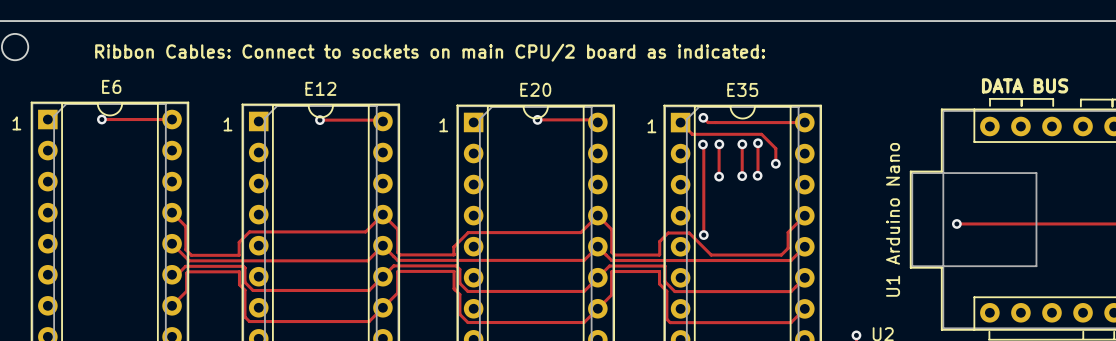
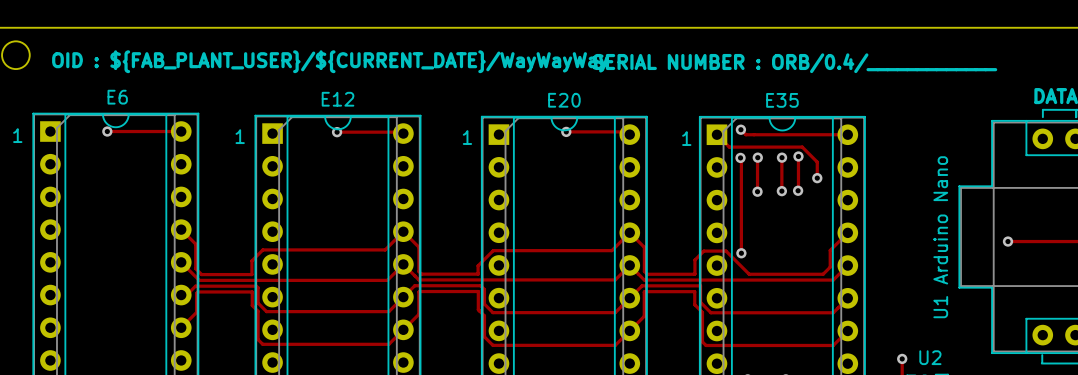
text: Ribbon Cables: Connect to sockets on main CPU/2 board as indicated: (430, 52) -> none
text: none -> OID : ${FAB_PLANT_USER}/${CURRENT_DATE}/WayWayWay (330, 61)
text: none -> SERIAL NUMBER : ORB/0.4/_____________ (795, 63)

